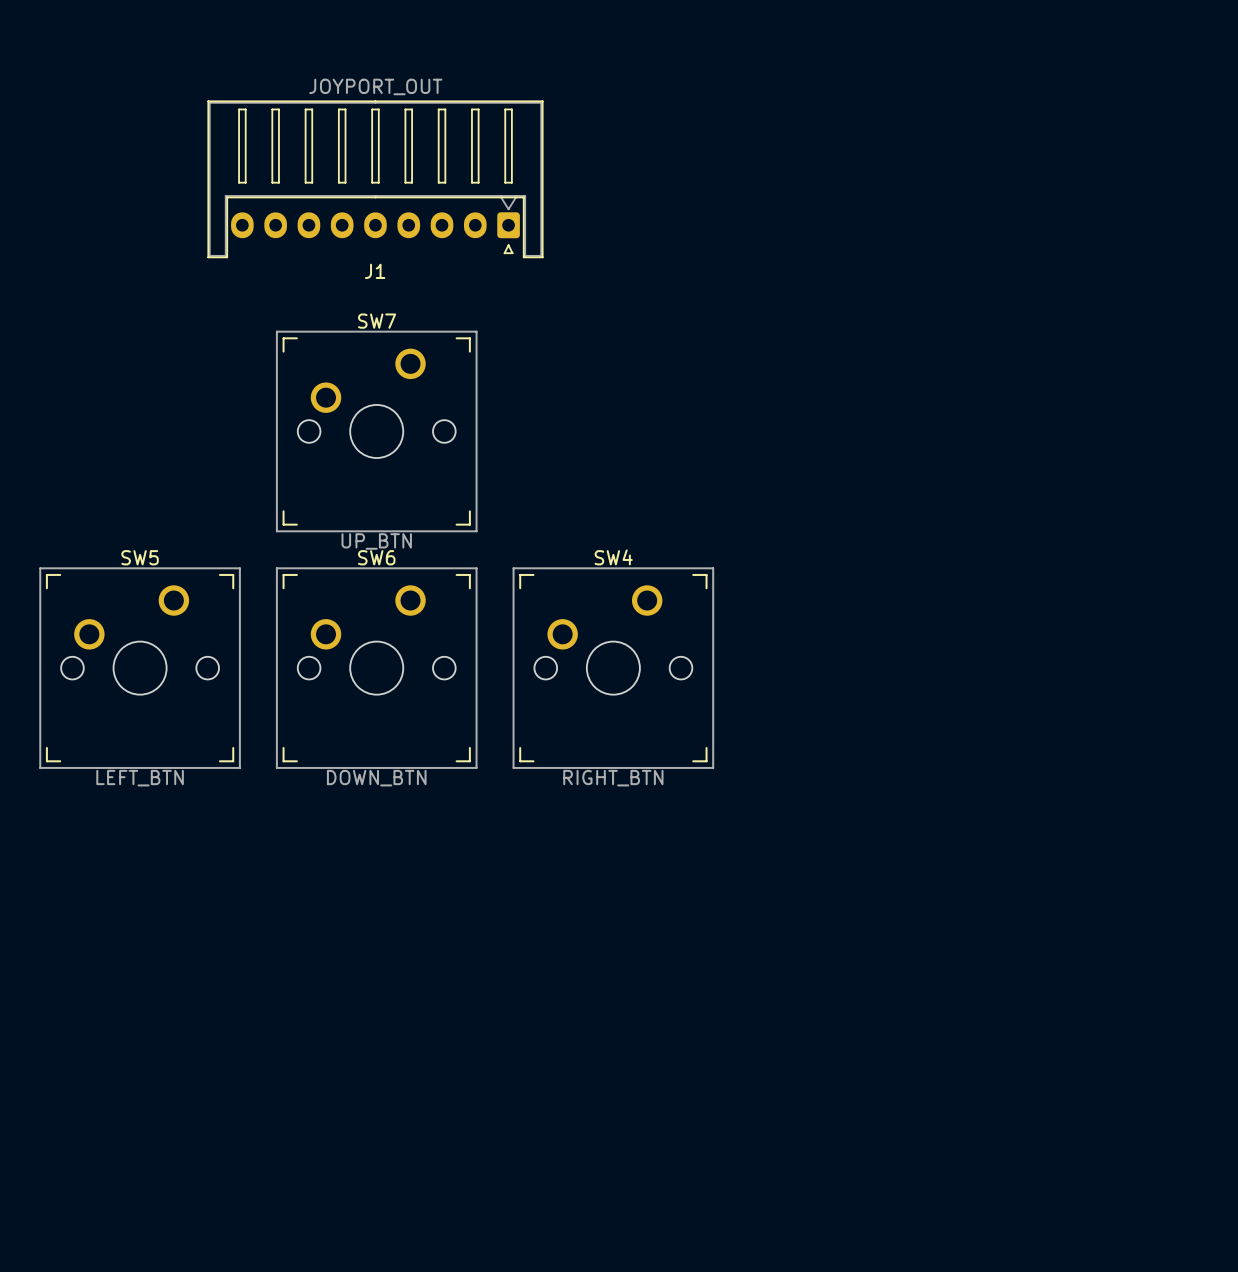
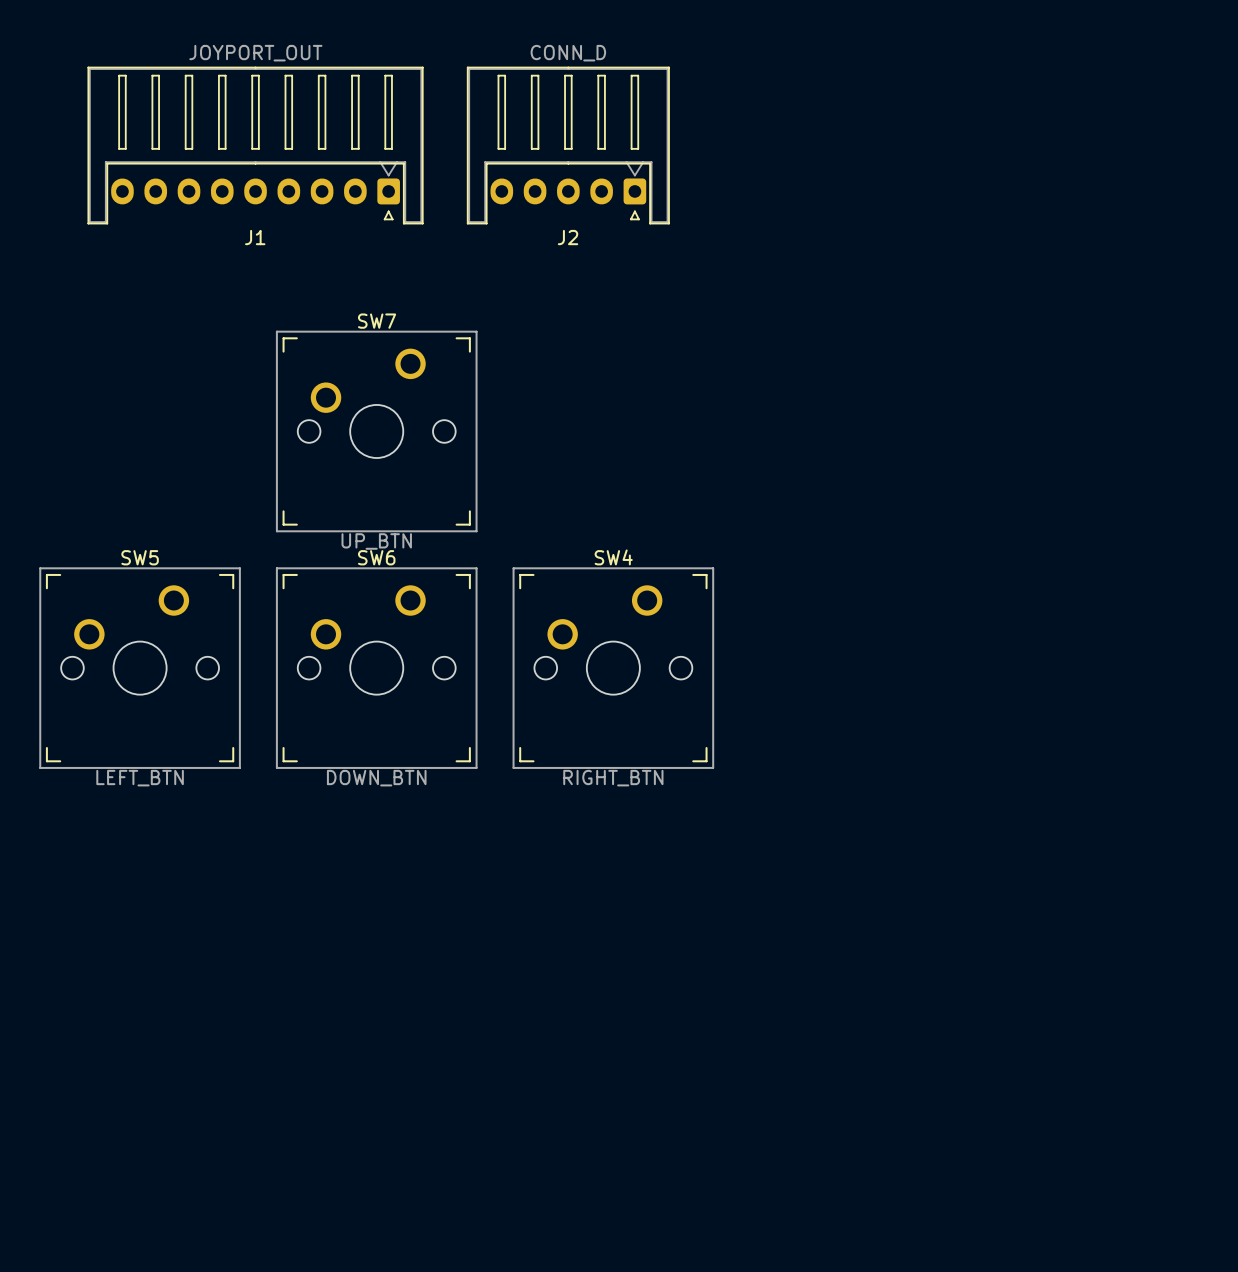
J2: none -> CONN_D (568, 145)
J1 position: (375, 179) -> (255, 145)

